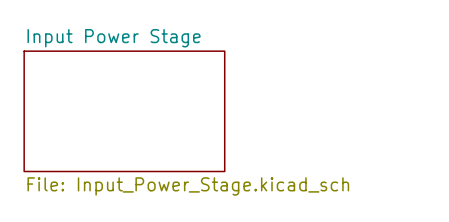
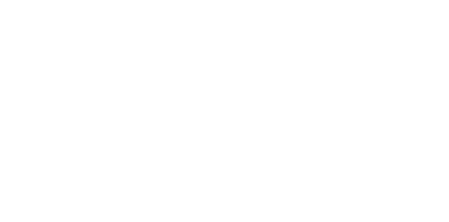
sheet Input Power Stage: File: Input_Power_Stage.kicad_sch (124, 111) -> none

